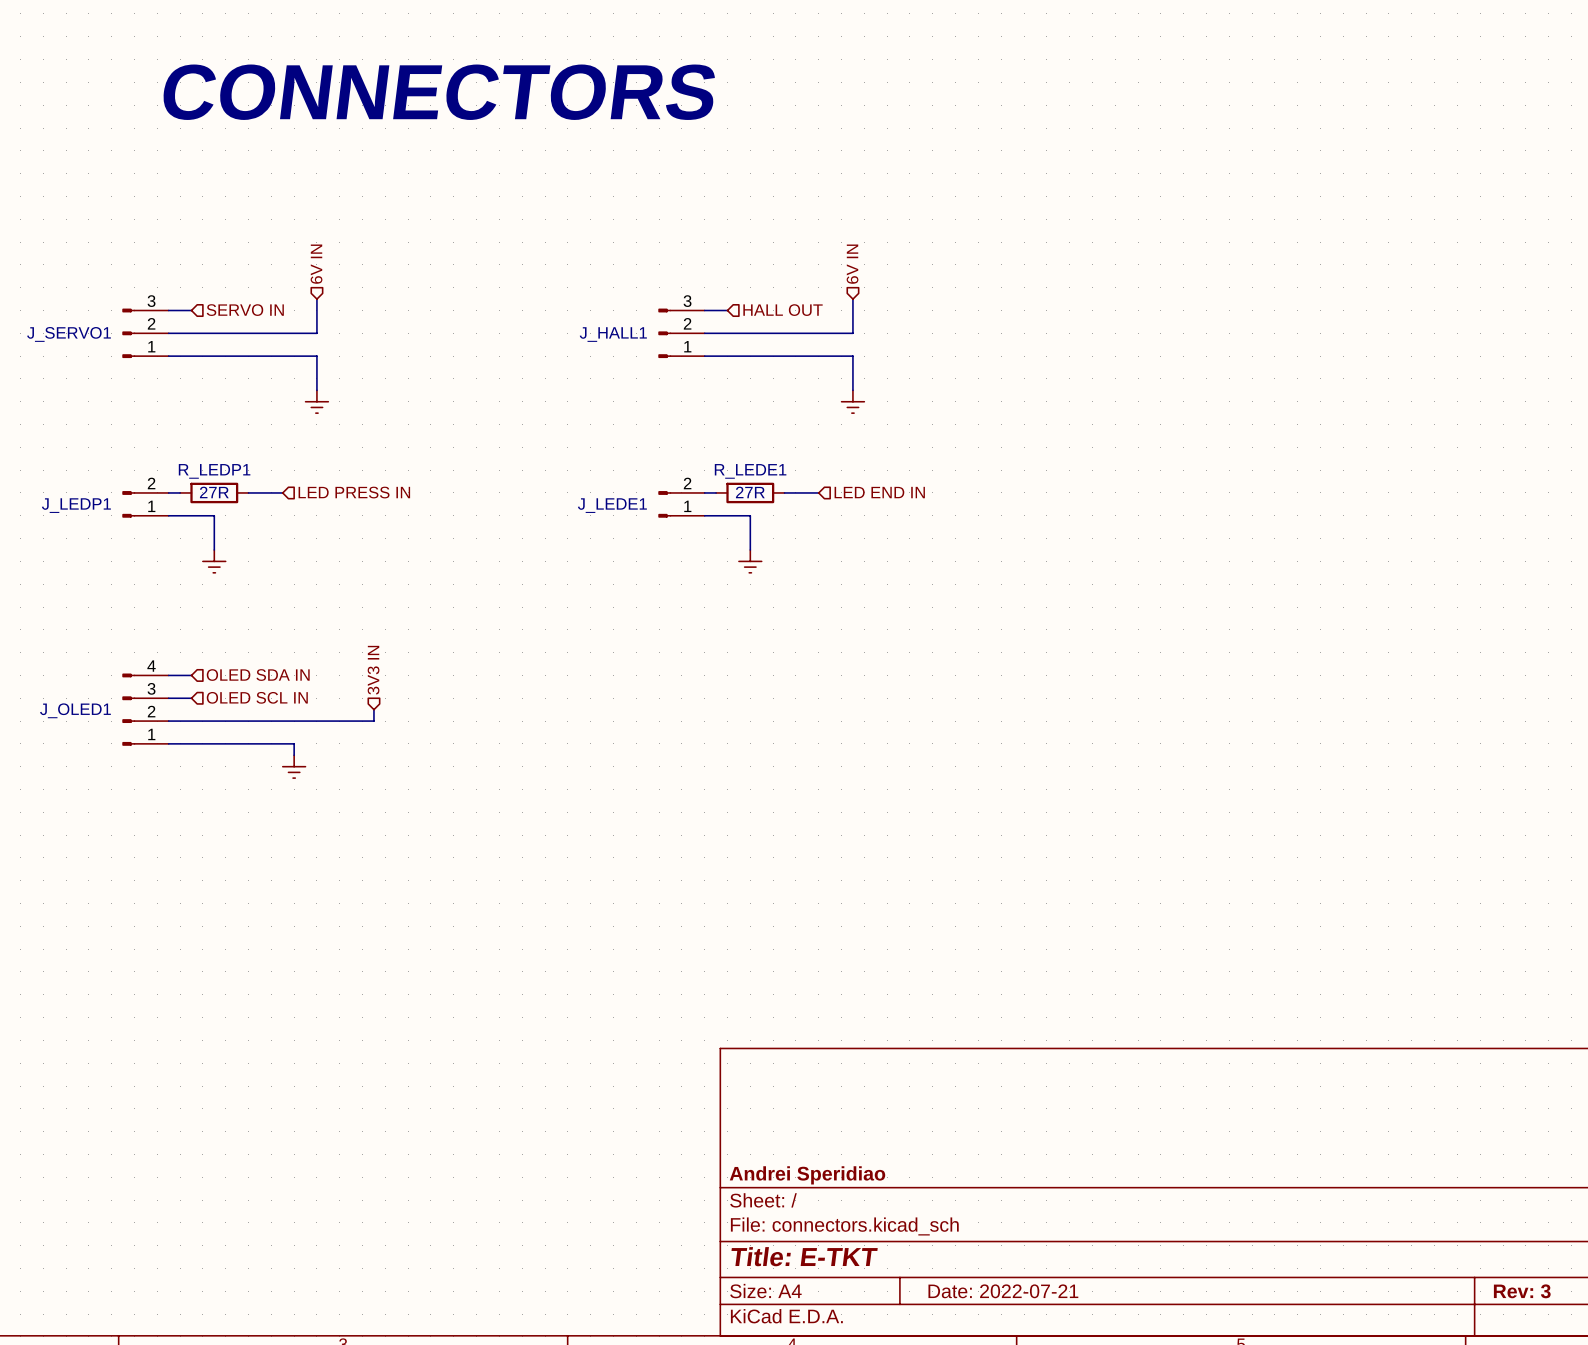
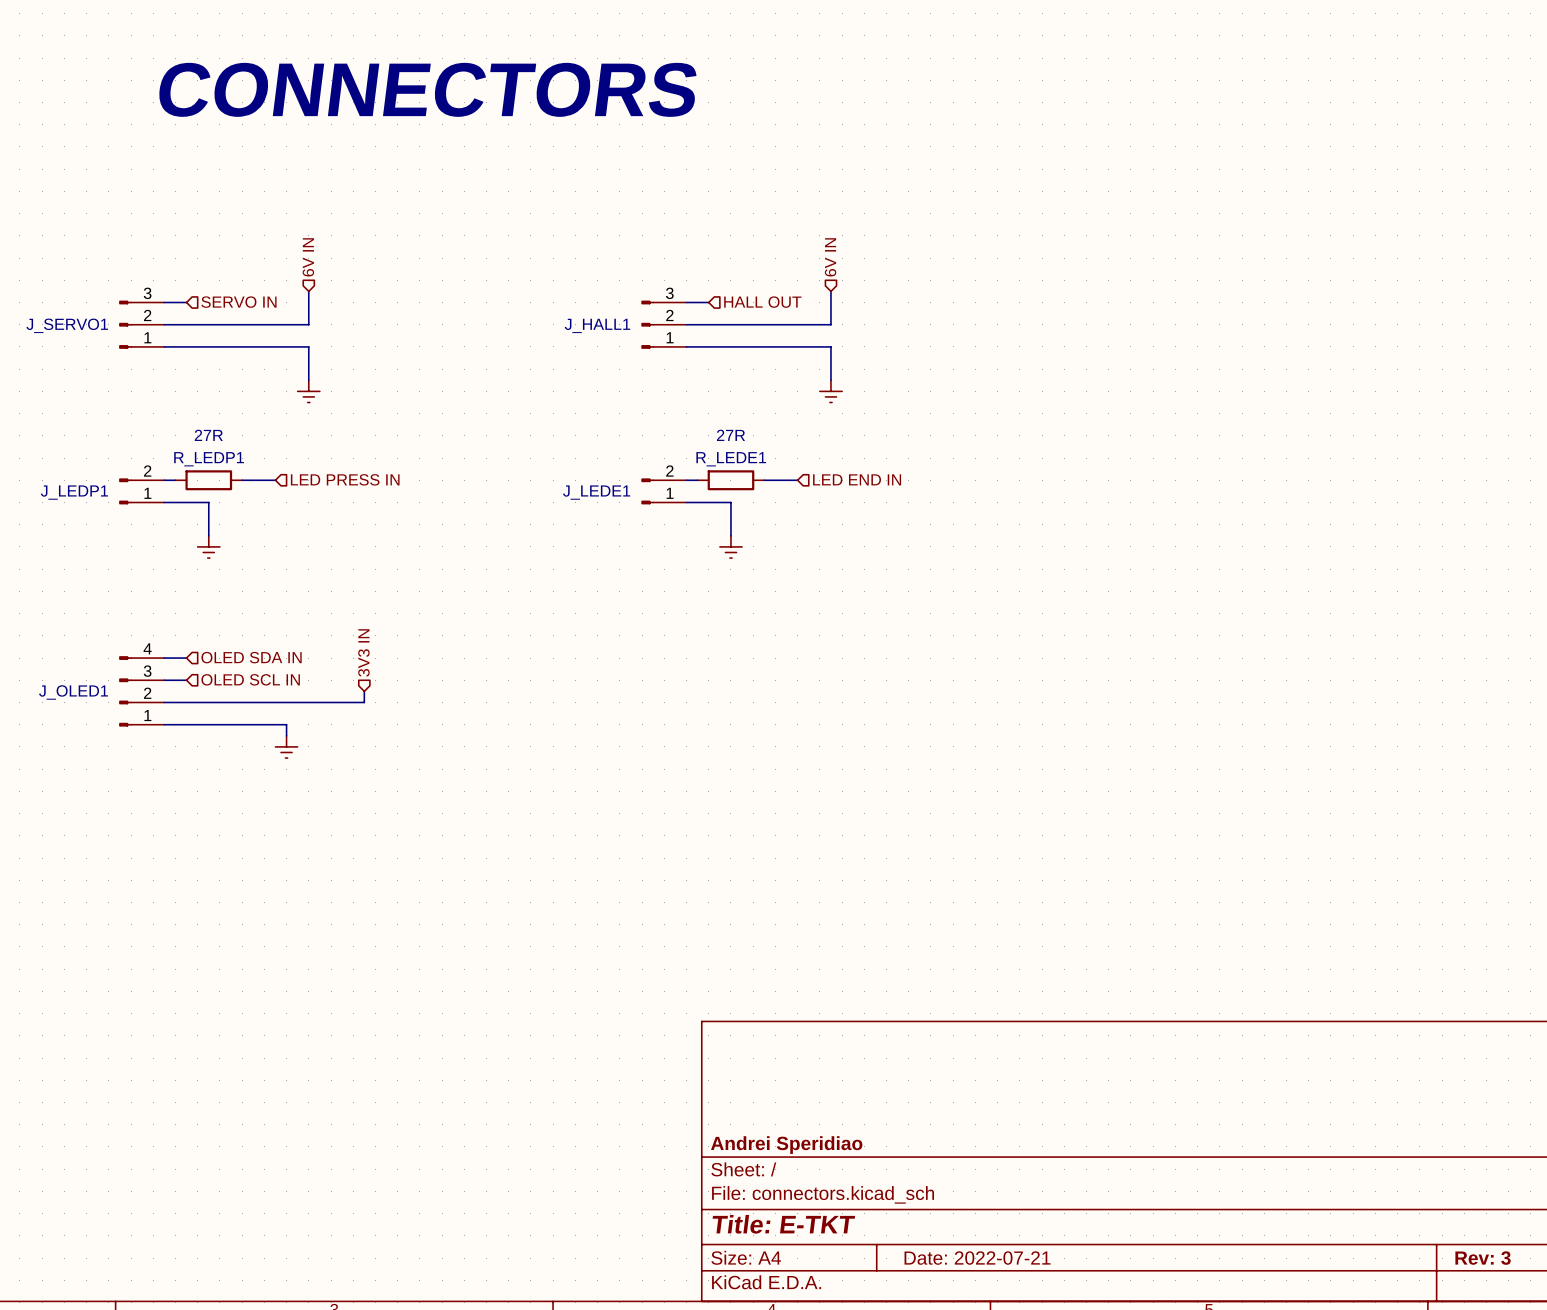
R_LEDP1 value position: 27R (214, 492) -> 27R (208, 435)
R_LEDE1 value position: 27R (750, 492) -> 27R (731, 435)

